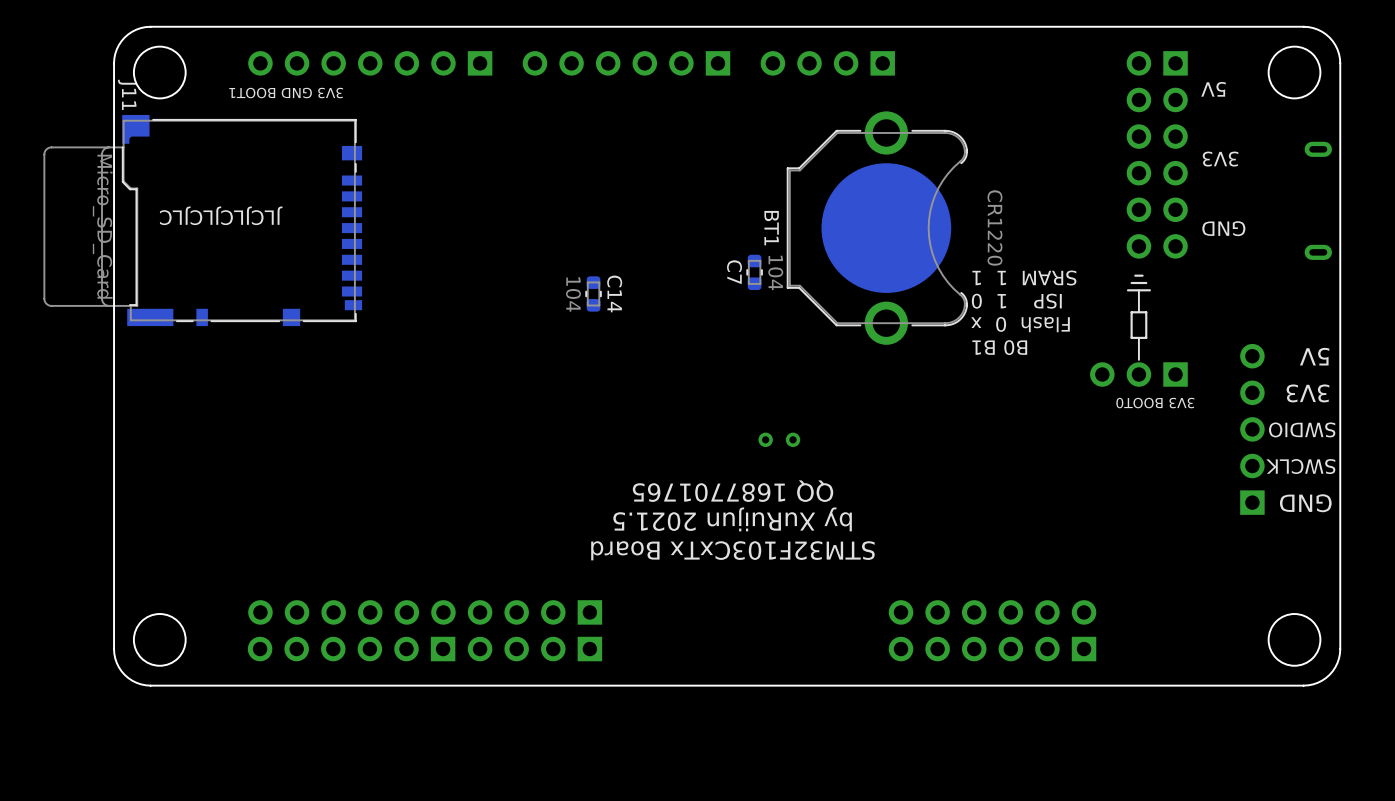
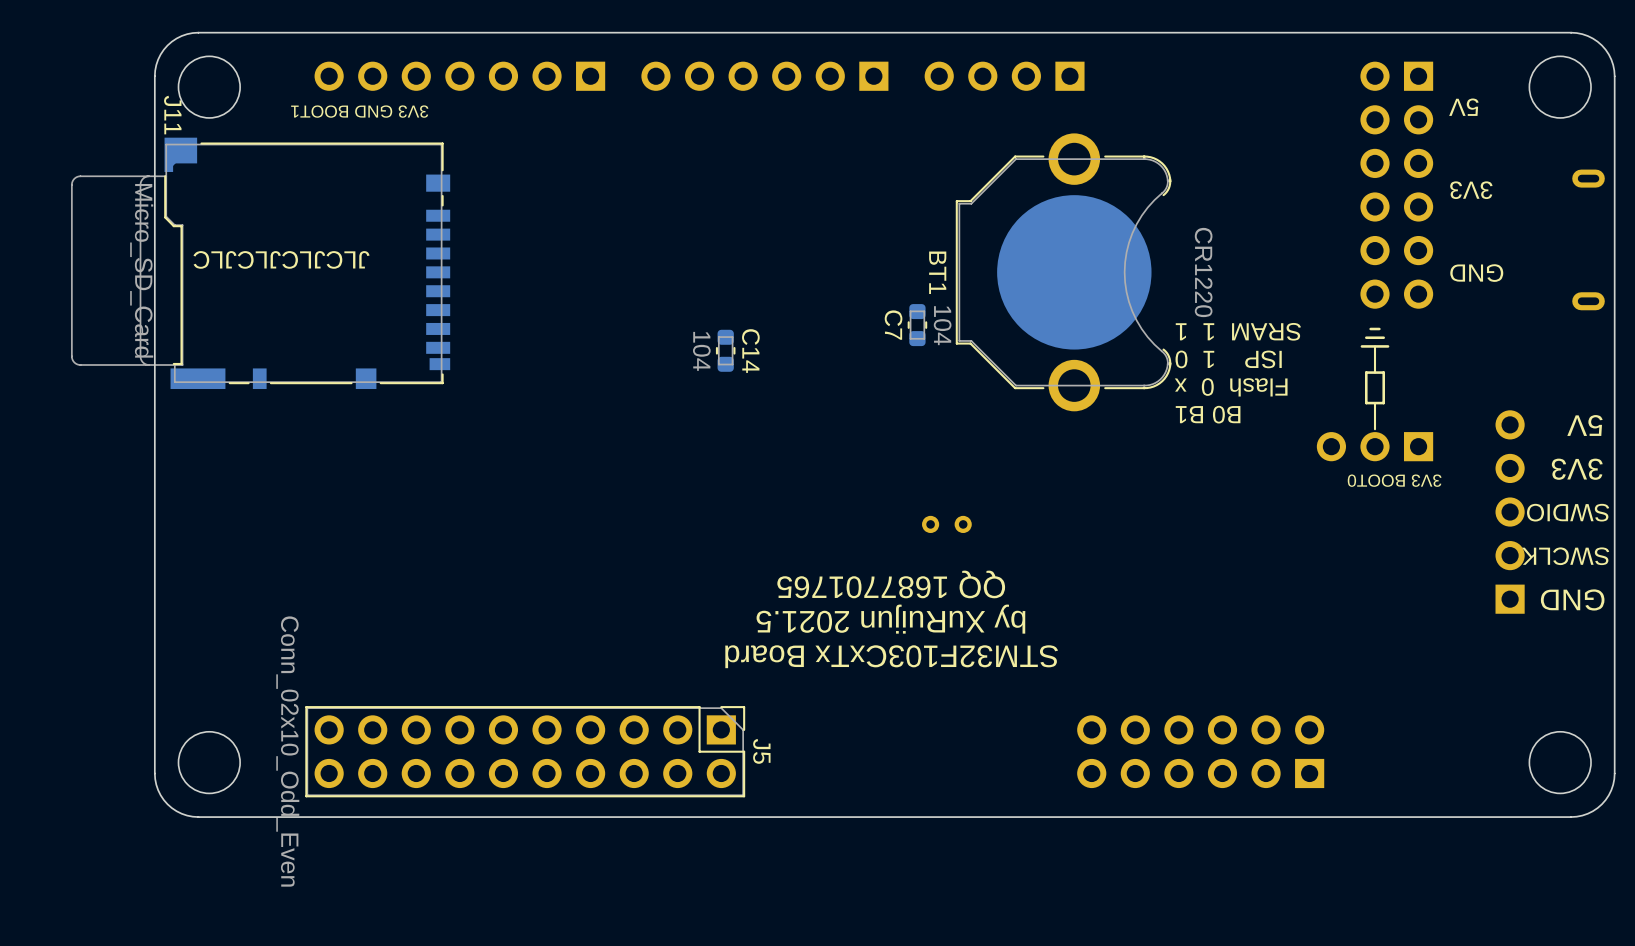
part: (425, 612) -> none
J5: none -> Conn_02x10_Odd_Even (525, 751)
part: (351, 649) -> none
part: (534, 649) -> none

